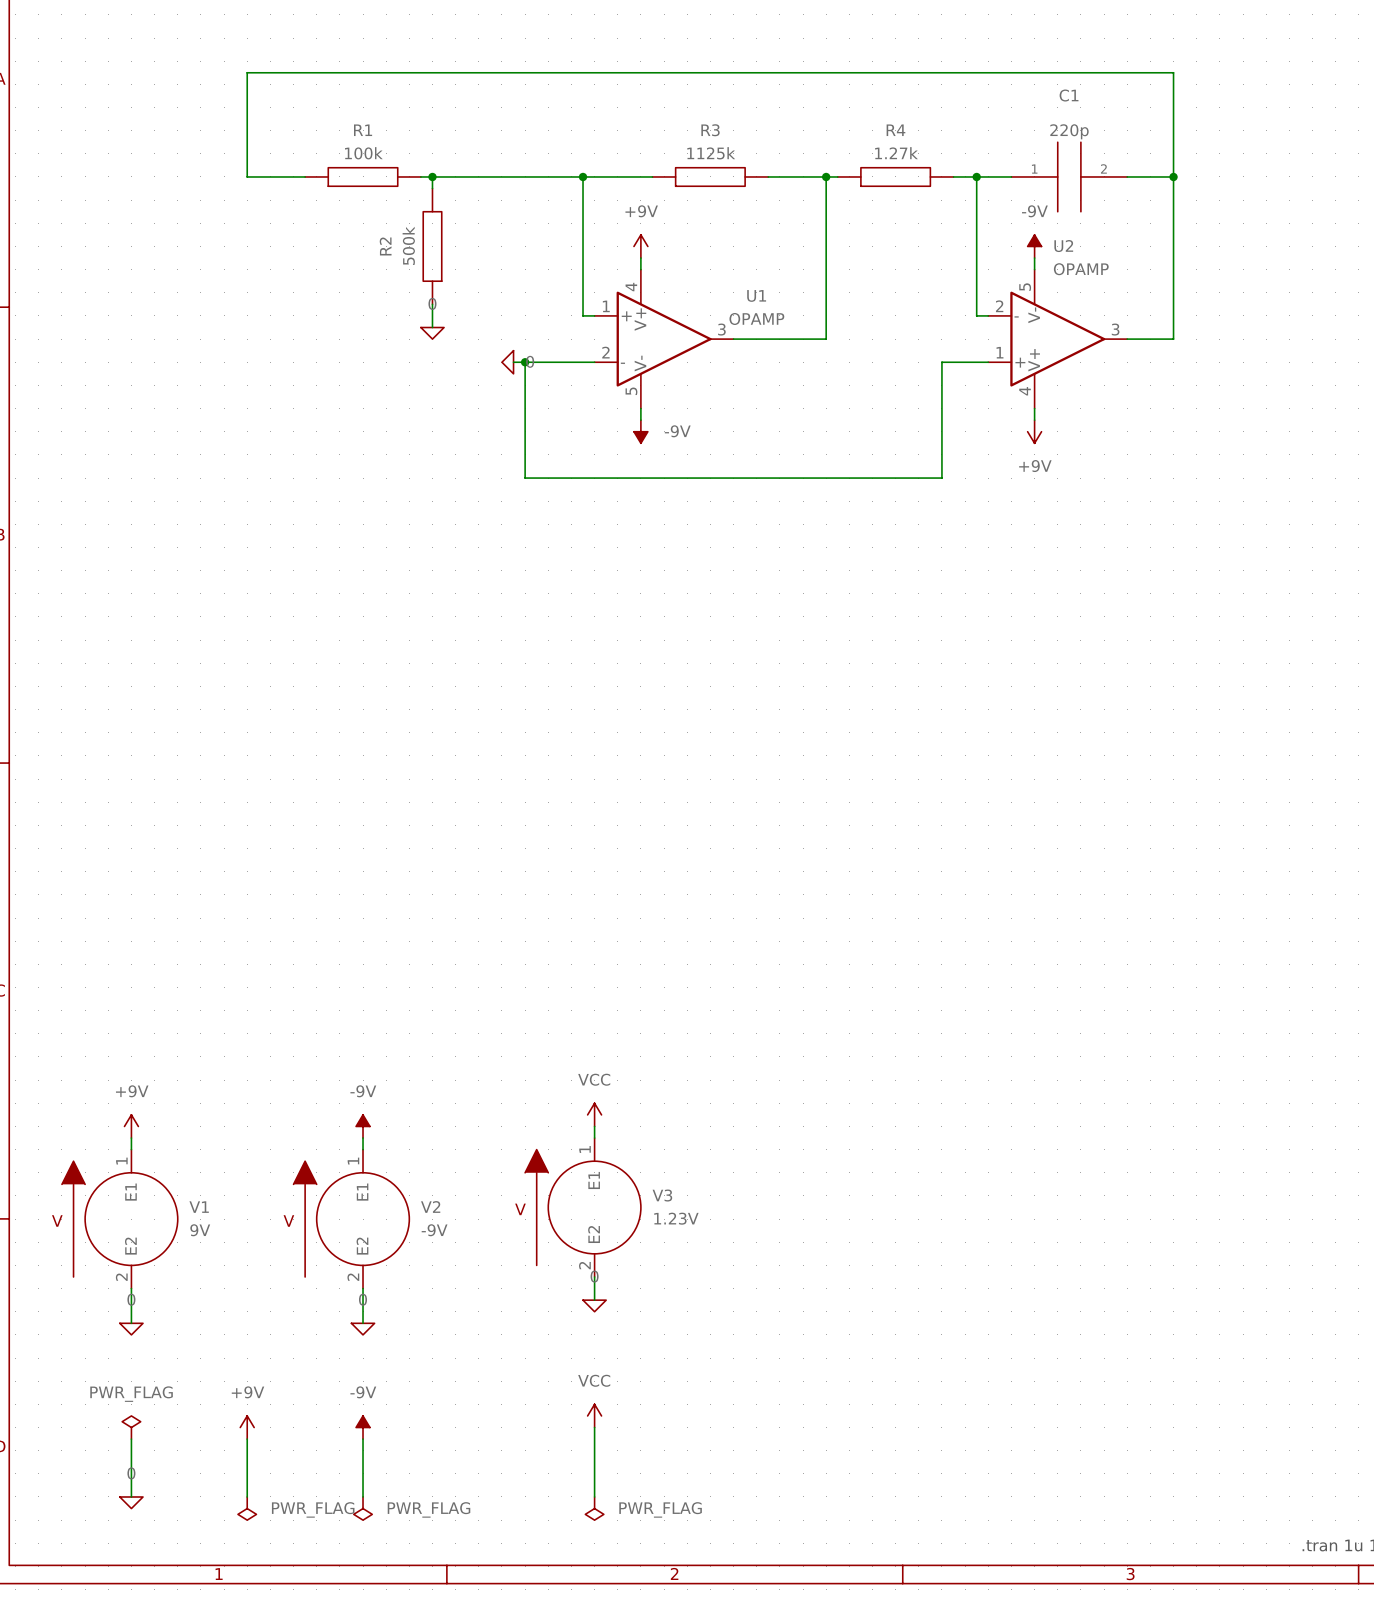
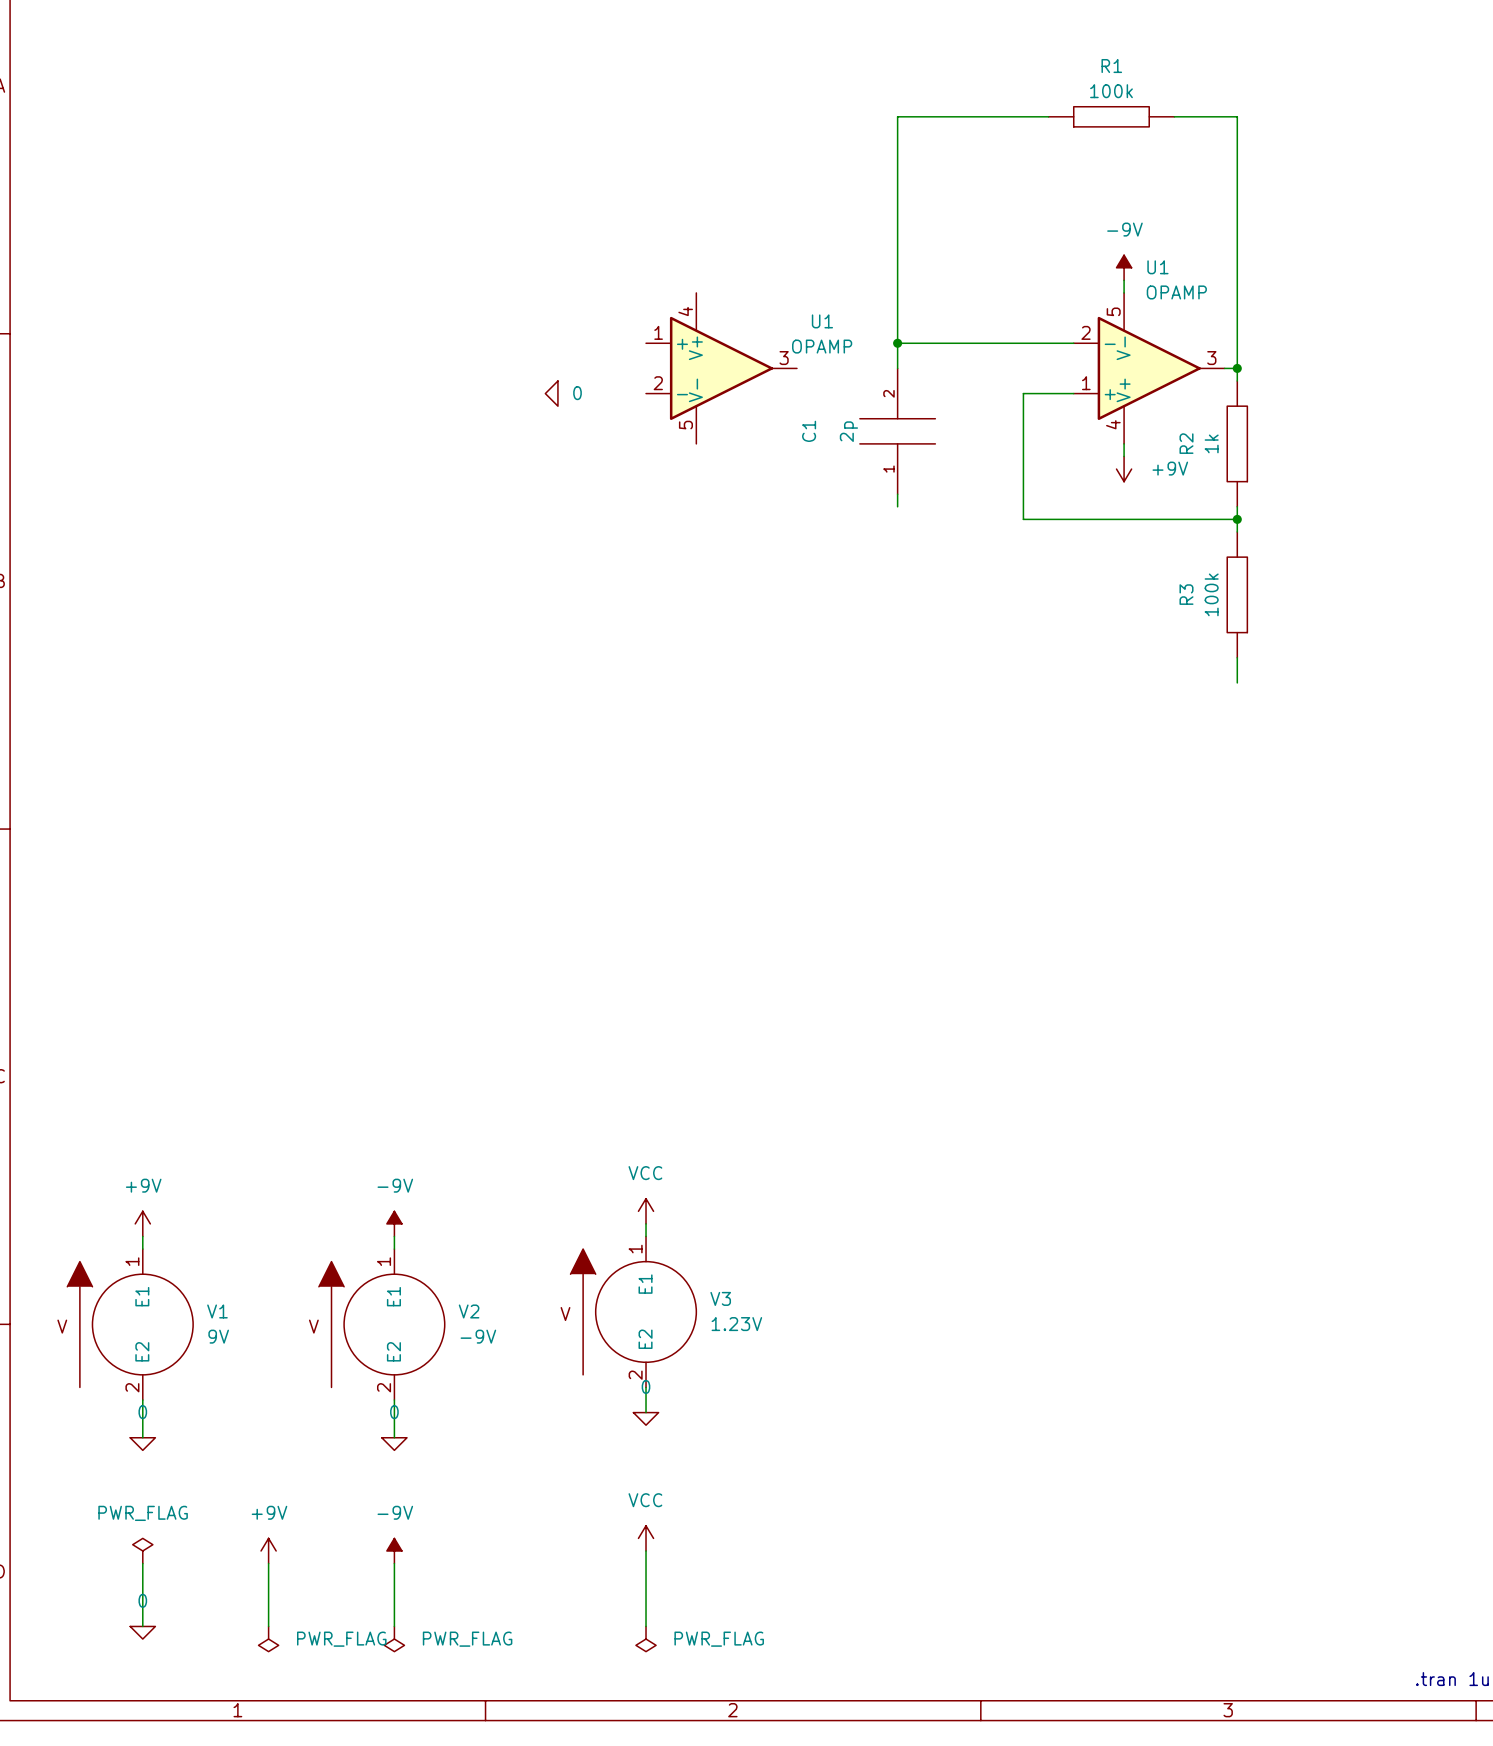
wire: none -> (1048, 116) (897, 116) (897, 192)
wire: none -> (1174, 116) (1237, 116) (1237, 381)
R3 name position: R3 (710, 130) -> R3 (1186, 594)
C1 text: 220p (1069, 131) -> 2p (848, 431)
R3 text: 1125k (711, 153) -> 100k (1211, 594)
wire: (305, 176) (247, 176) (247, 72) (1173, 72) (1173, 339) (1138, 339) -> none
R1 position: (363, 176) -> (1111, 116)
wire: (420, 176) (652, 176) -> none
wire: (432, 176) (432, 188) -> none
junction: (432, 176) -> none
wire: (583, 176) (583, 315) (594, 315) -> none
junction: (583, 176) -> none
R3 rotation: 0° (710, 176) -> 90° clockwise (1237, 594)
R3 position: (710, 176) -> (1237, 594)
wire: (768, 176) (837, 176) -> none
junction: (826, 176) -> none
R4: (895, 176) -> none
wire: (953, 176) (1011, 176) -> none
wire: (976, 176) (976, 315) -> (897, 343) (1061, 343)
junction: (976, 176) -> none
C1 rotation: 0° (1069, 176) -> 90° counterclockwise (897, 431)
C1 position: (1069, 176) -> (897, 431)
wire: (1127, 176) (1173, 176) -> none
junction: (1173, 176) -> none
R2 text: 500k (408, 245) -> 1k (1211, 443)
R2 position: (432, 246) -> (1237, 443)
power symbol: +9V (640, 246) -> none
U2 name: U2 (1063, 246) -> U1 (1157, 267)
wire: (640, 258) (640, 269) -> none
wire: (432, 304) (432, 327) -> none
junction: none -> (897, 343)
power symbol: 0 (432, 333) -> none
wire: (733, 339) (826, 339) -> none
junction: none -> (1237, 368)
wire: (513, 362) (594, 362) -> none
wire: (525, 362) (525, 478) (941, 478) -> (1237, 519) (1023, 519)
junction: (525, 362) -> none
wire: (640, 408) (640, 420) -> (897, 494) (897, 506)
power symbol: -9V (640, 431) -> none
power symbol text position: +9V (1035, 466) -> +9V (1170, 468)
wire: none -> (1237, 506) (1237, 531)
junction: none -> (1237, 519)
wire: none -> (1237, 657) (1237, 682)

